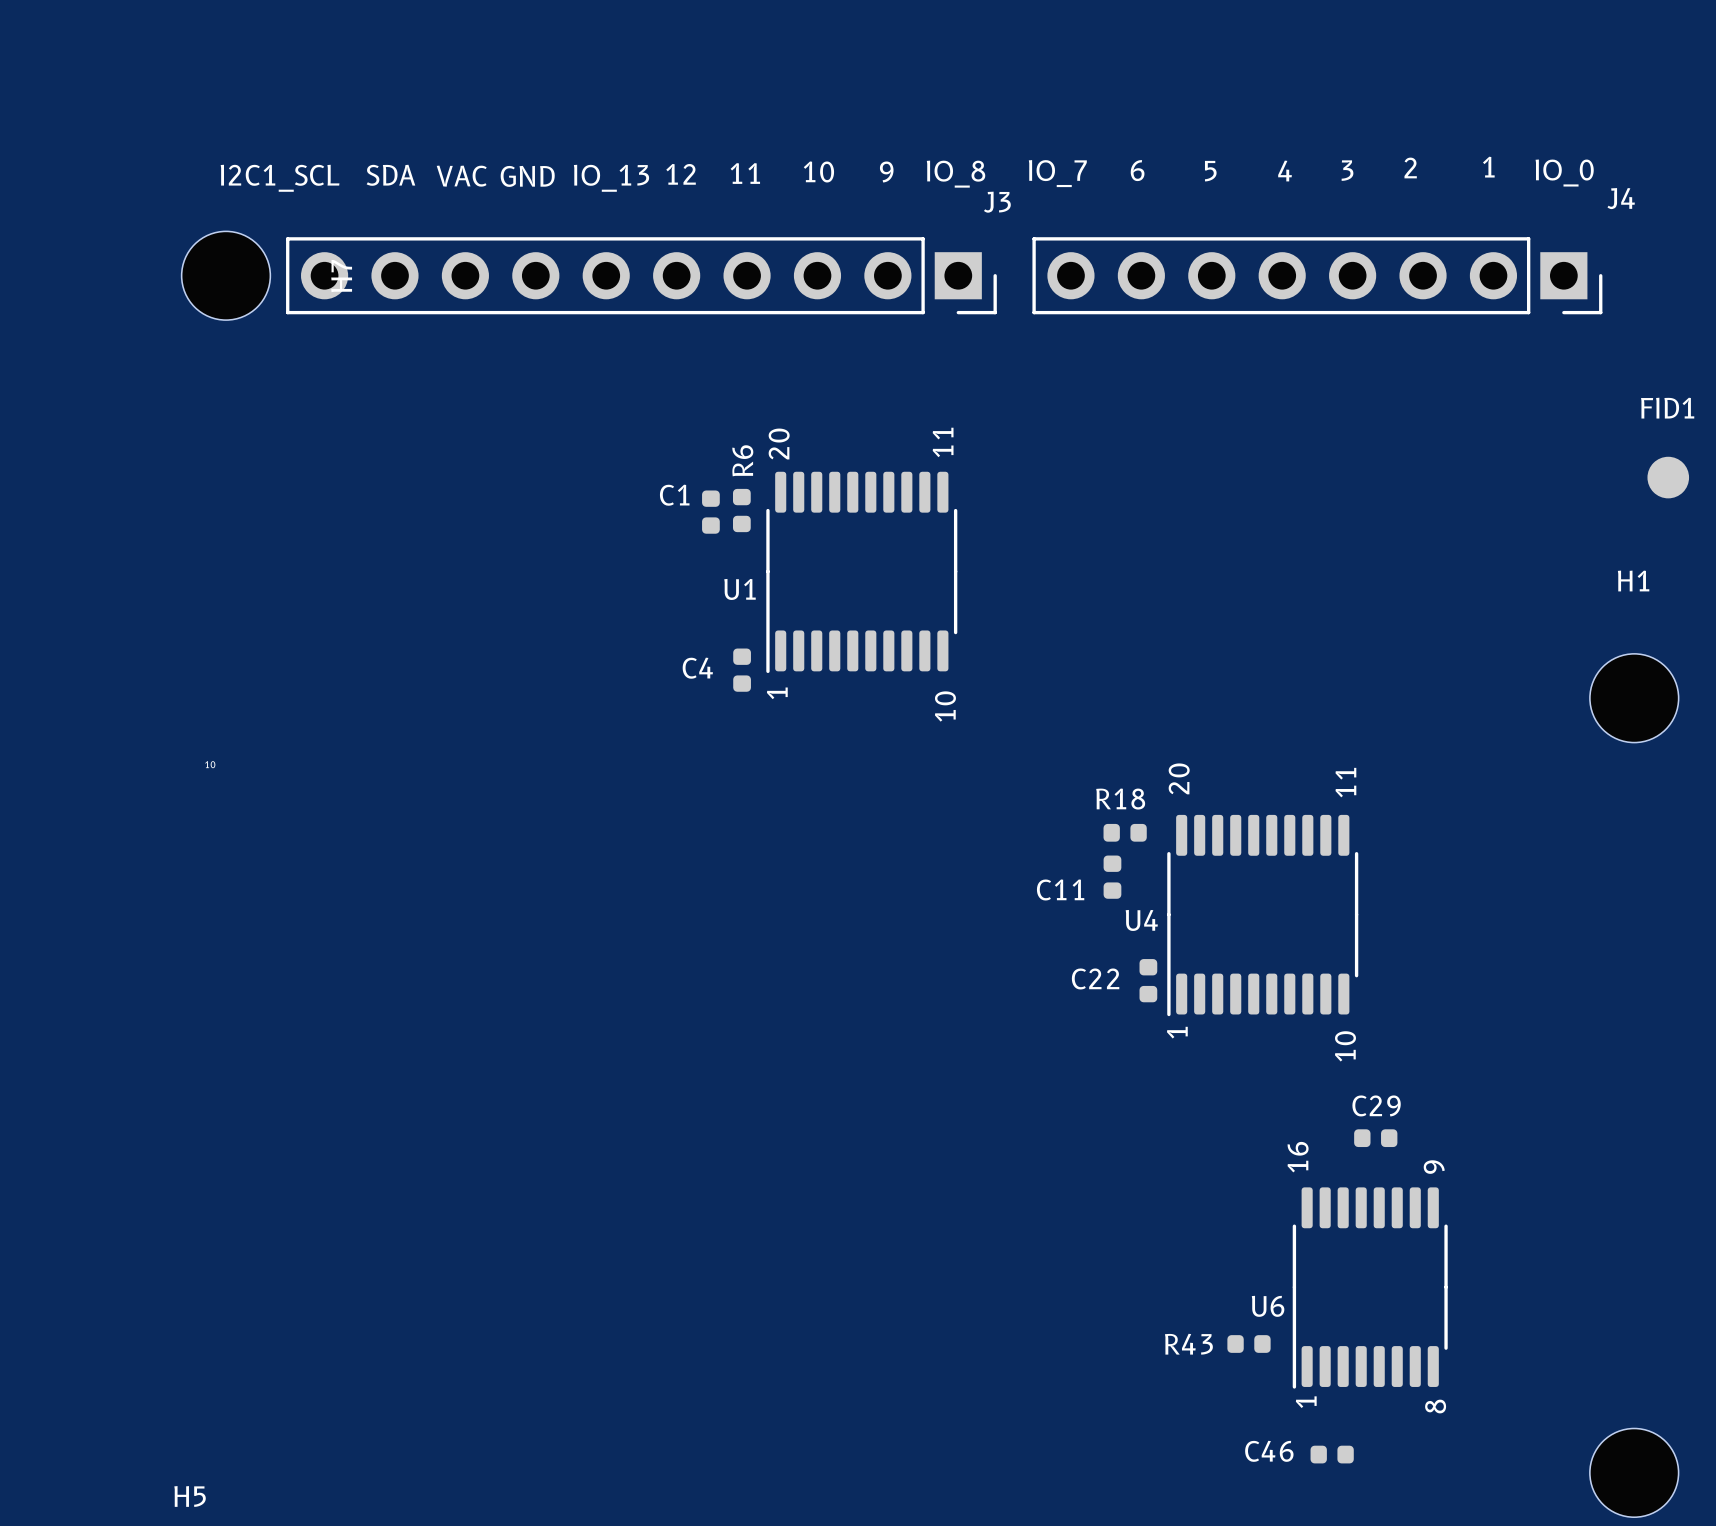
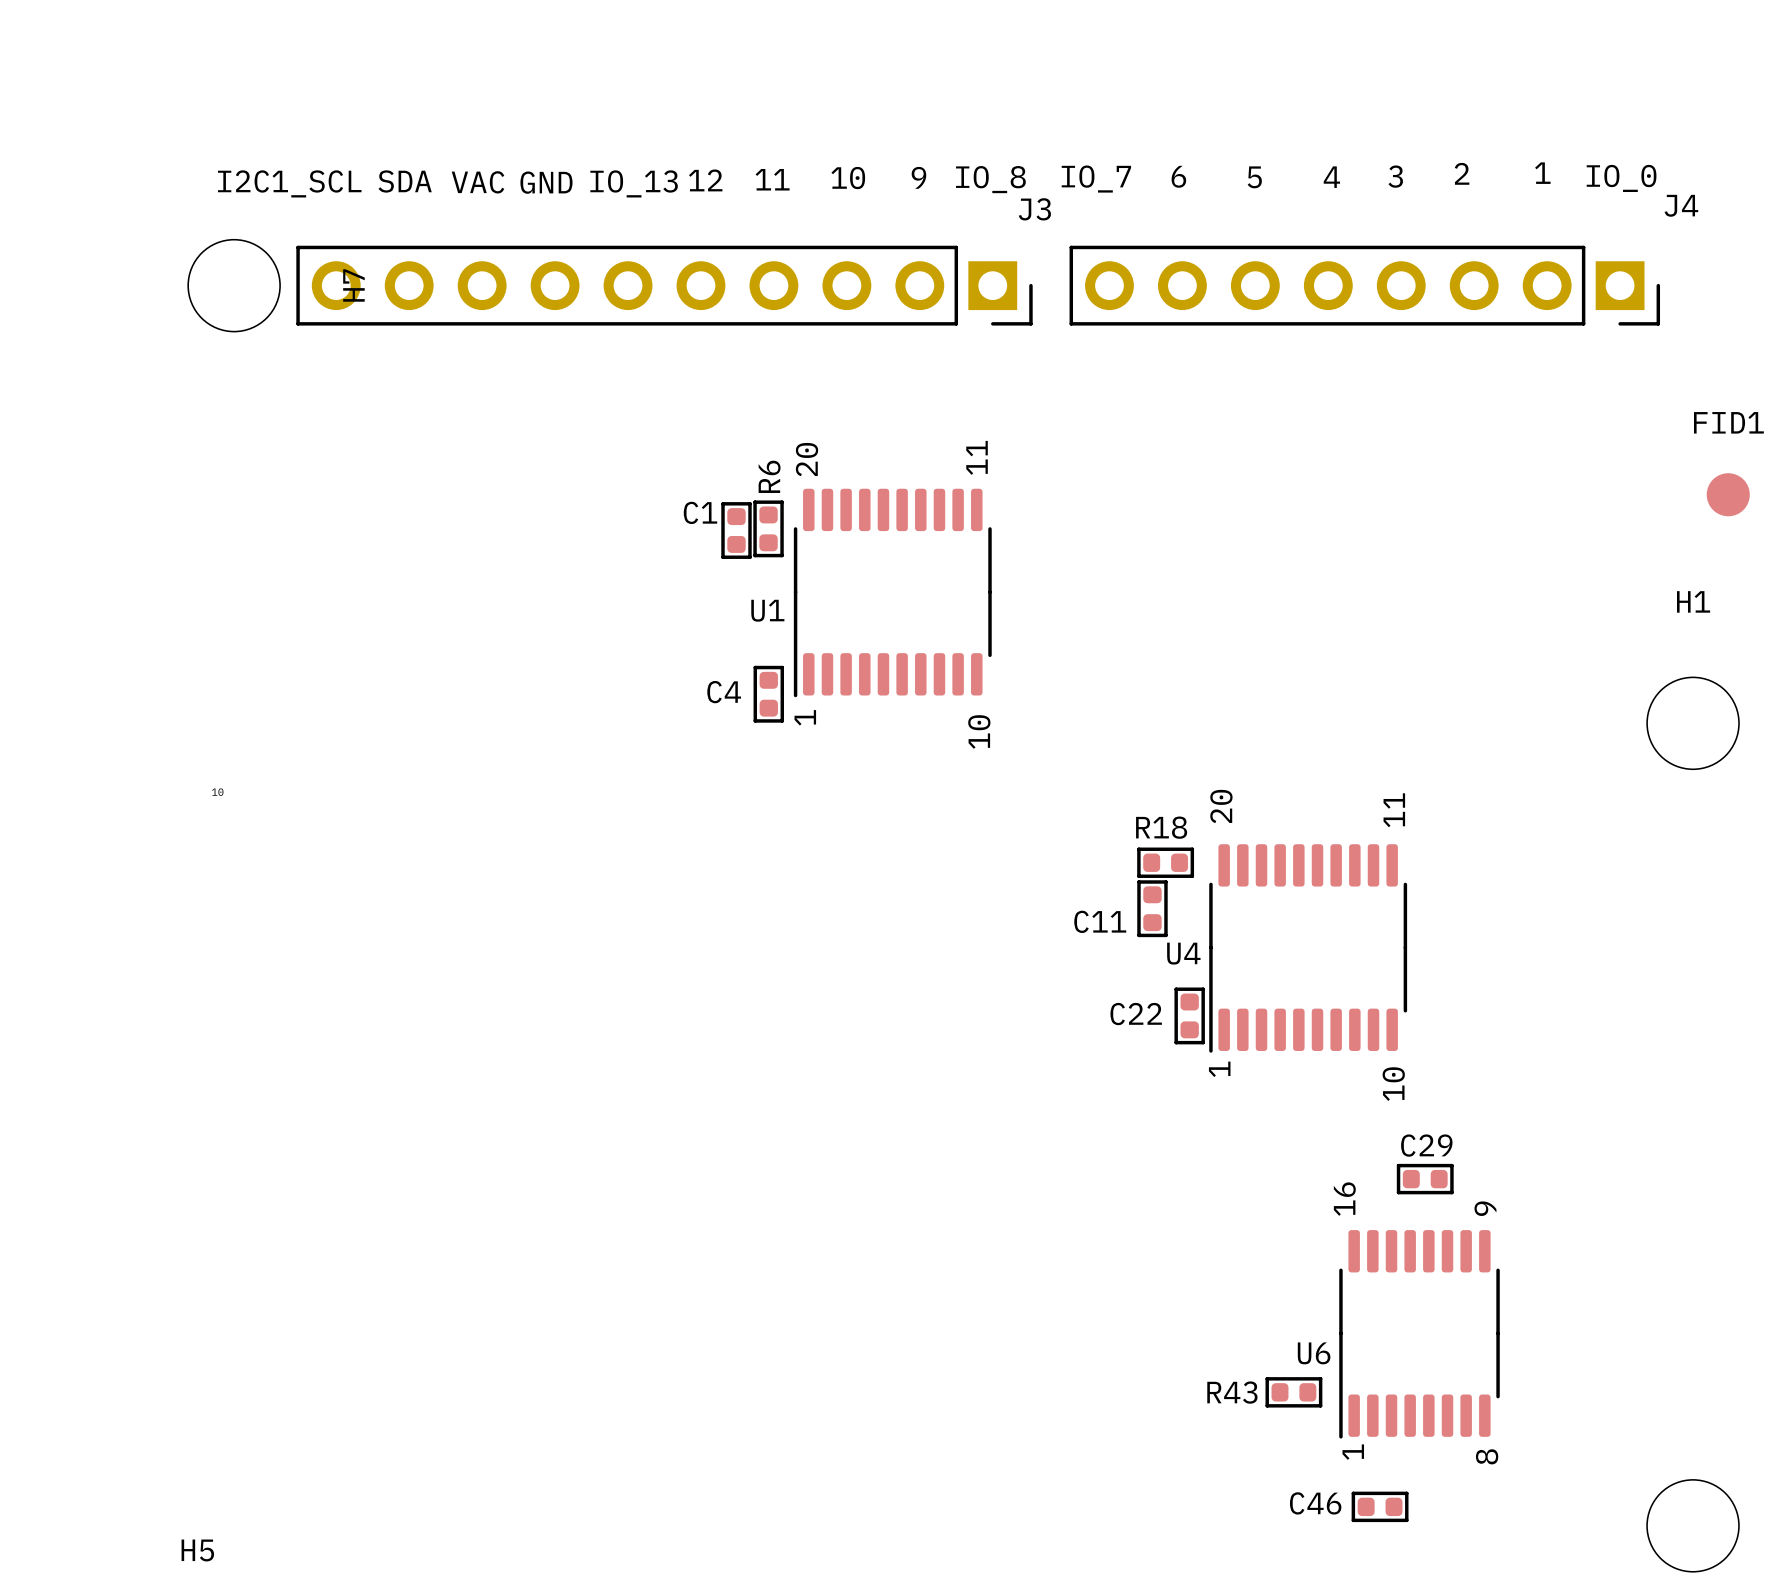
R6 footprint: [732, 488, 751, 533] -> [753, 500, 784, 558]
C1 footprint: [702, 490, 720, 534] -> [721, 502, 752, 559]
C4 footprint: [733, 648, 751, 692] -> [753, 665, 785, 723]
R18 footprint: [1103, 823, 1147, 842] -> [1137, 847, 1195, 878]
C11 footprint: [1103, 855, 1122, 899] -> [1137, 880, 1168, 938]
C22 footprint: [1139, 959, 1158, 1003] -> [1174, 987, 1205, 1045]
C29 footprint: [1354, 1129, 1398, 1148] -> [1396, 1163, 1454, 1195]
R43 footprint: [1227, 1335, 1271, 1353] -> [1265, 1377, 1323, 1408]
C46 footprint: [1310, 1445, 1354, 1464] -> [1351, 1491, 1409, 1523]

